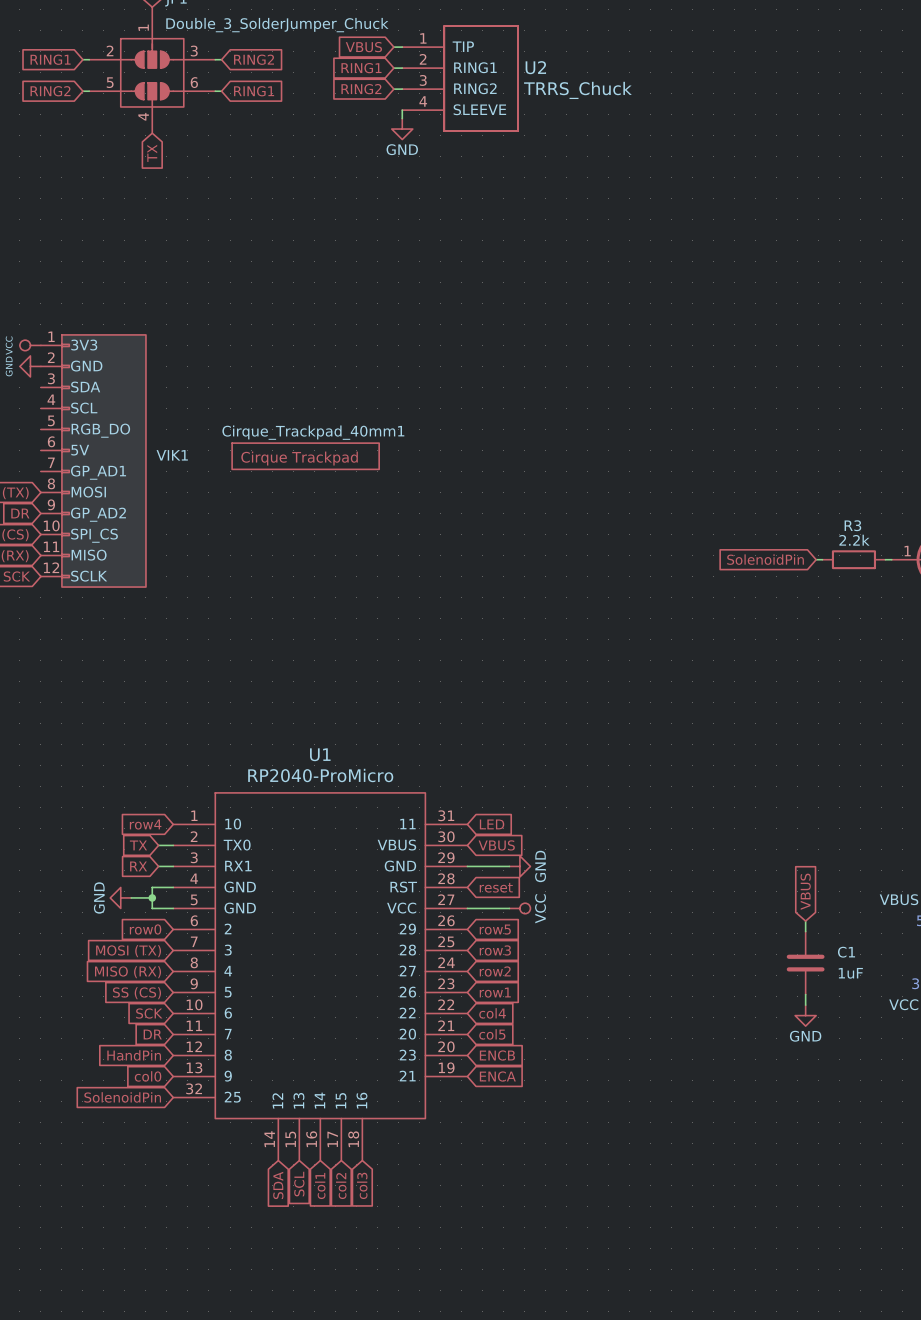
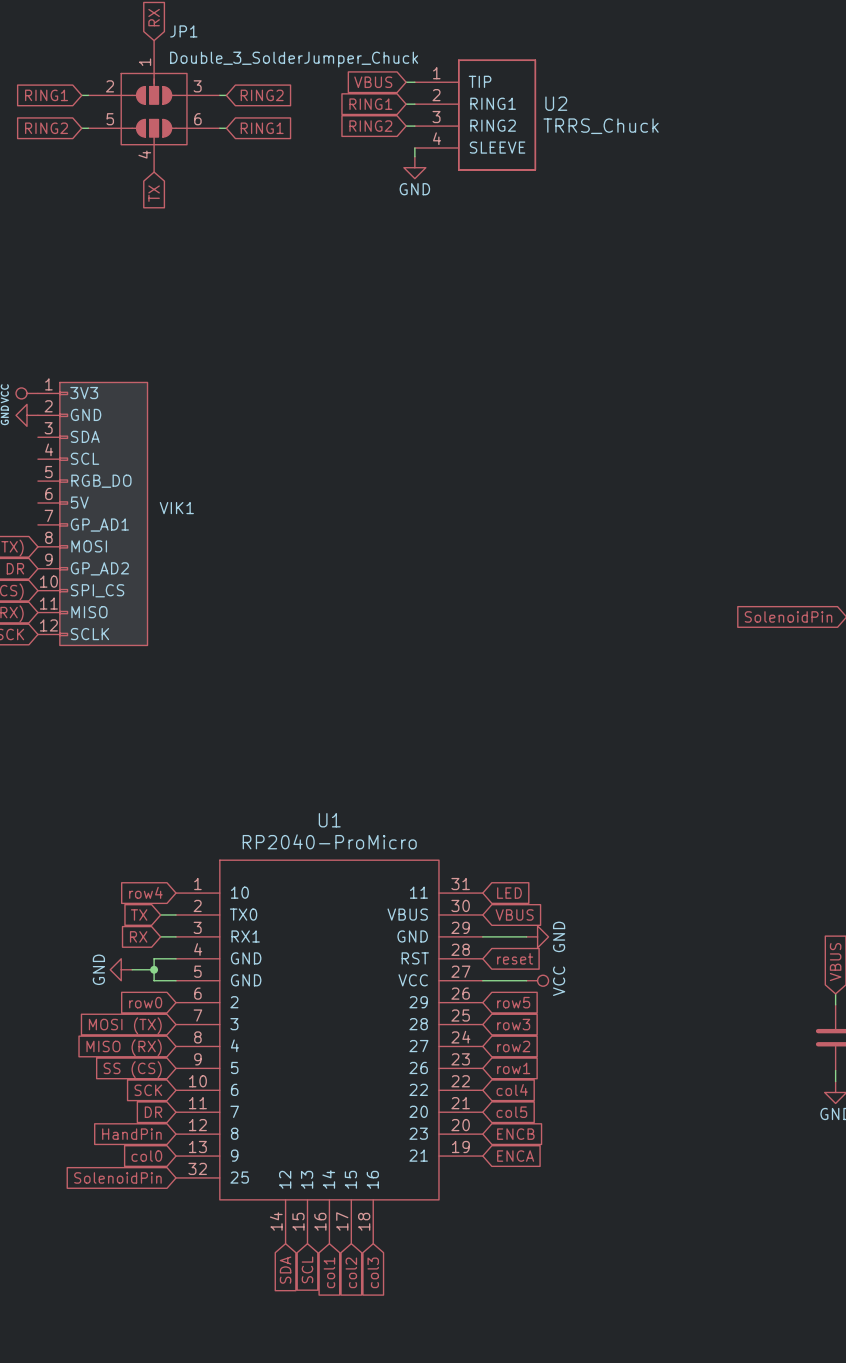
Cirque_Trackpad_40mm1: (305, 456) -> none

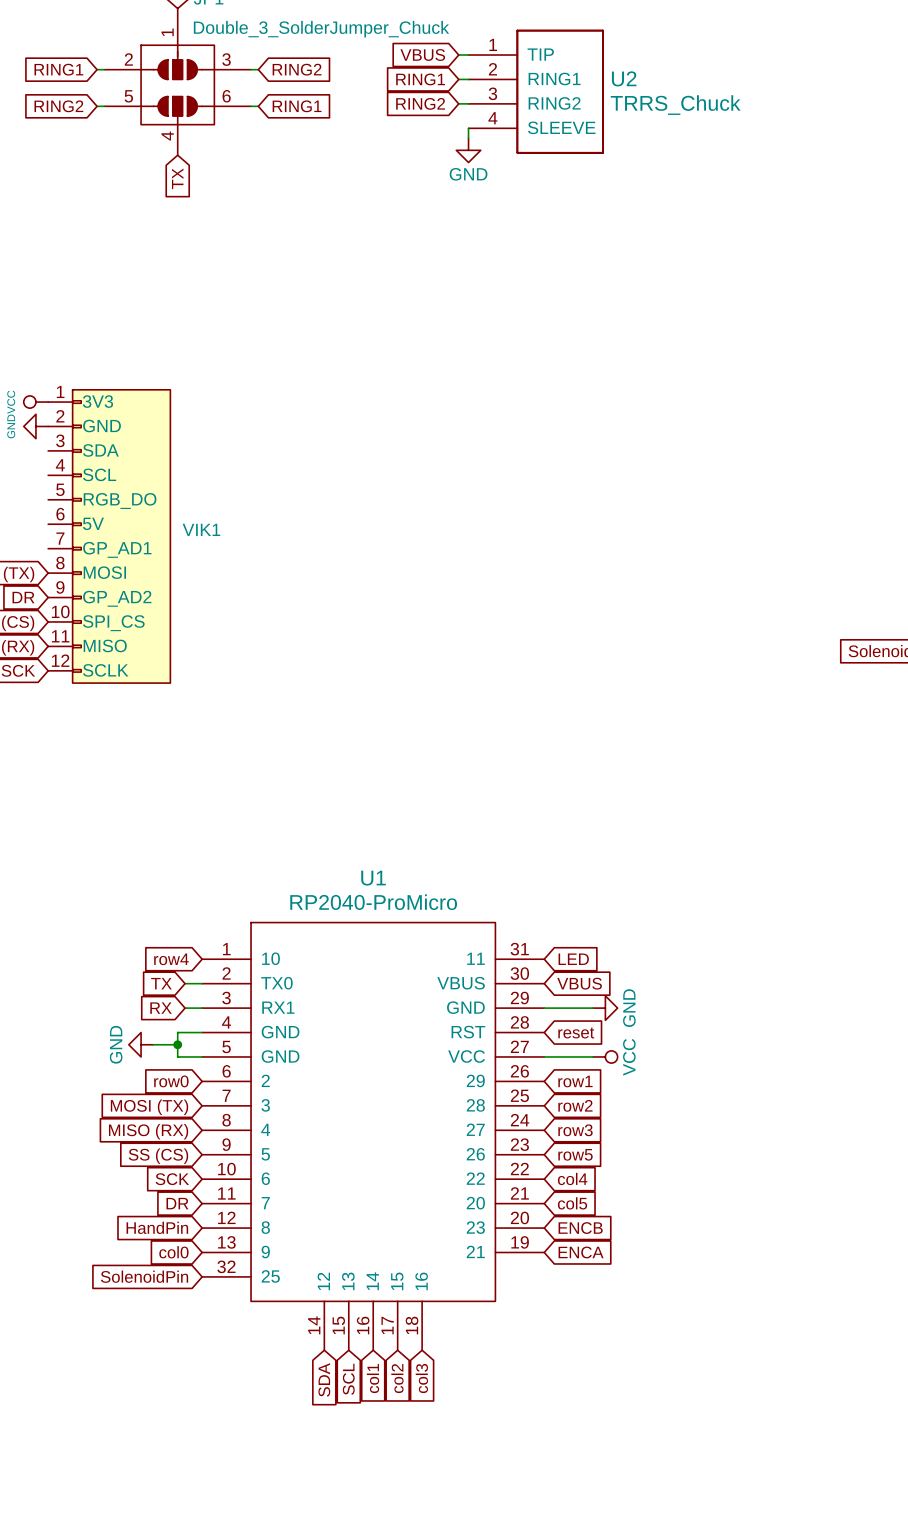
global label: row5 (513, 1002) -> row1 (575, 1081)
global label: row3 (513, 1024) -> row2 (575, 1105)
global label: row2 (513, 1046) -> row3 (575, 1130)
global label: row1 (513, 1068) -> row5 (575, 1154)

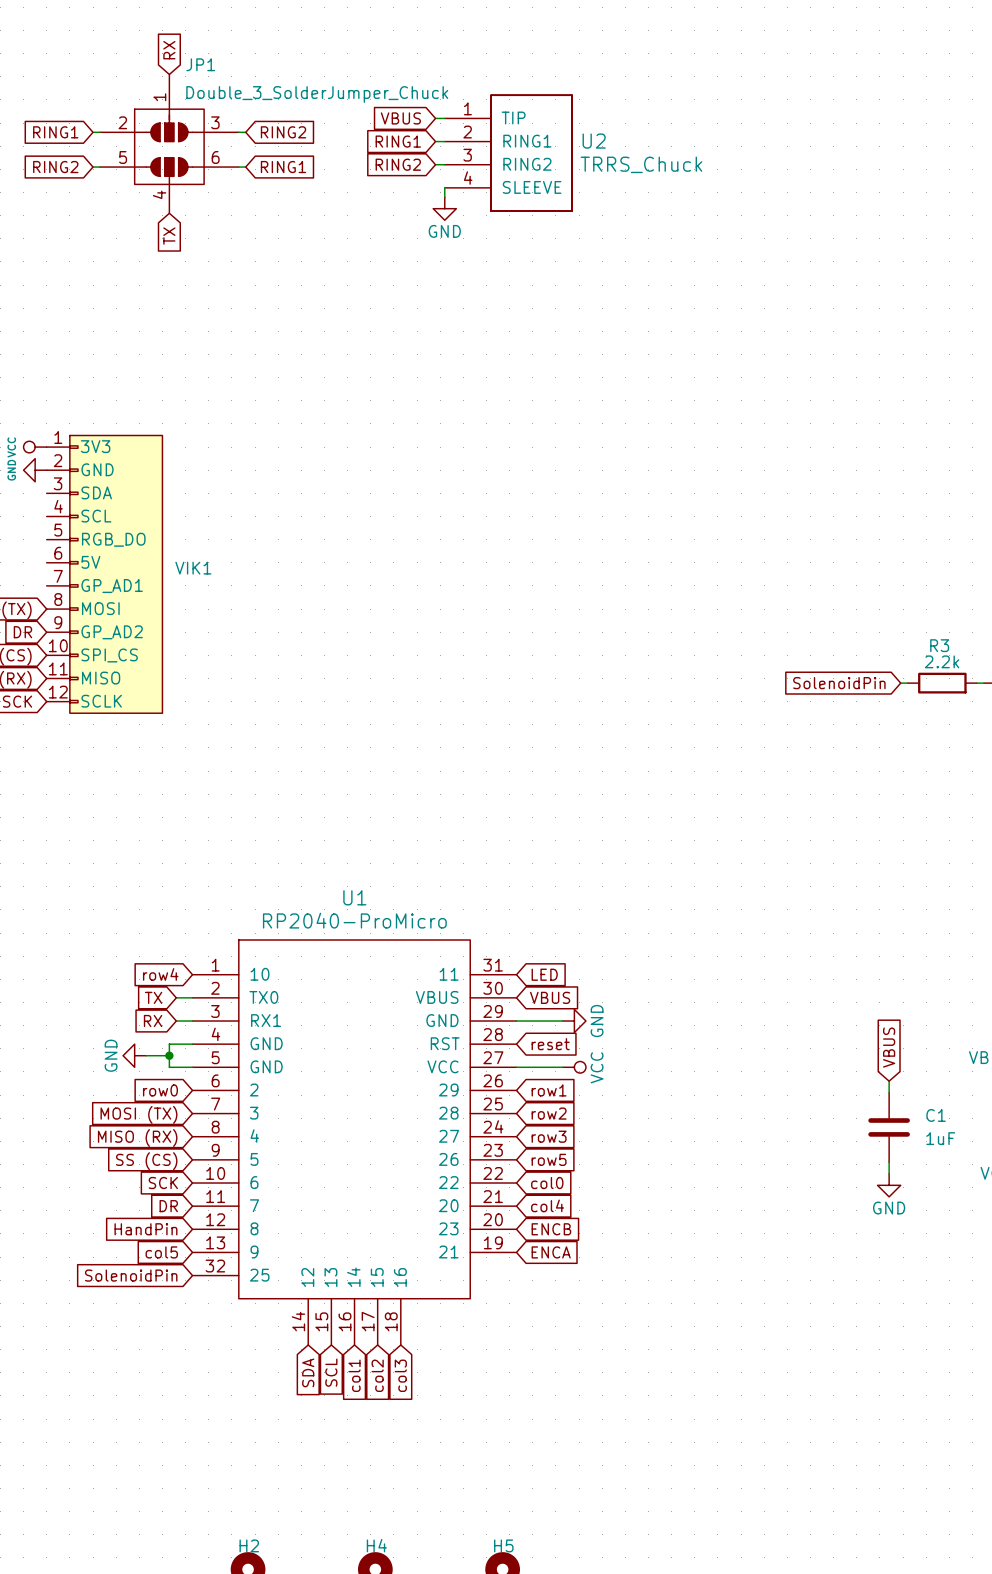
global label: col4 (572, 1178) -> col0 (547, 1183)
global label: col5 (572, 1203) -> col4 (547, 1205)
global label: col0 (173, 1252) -> col5 (161, 1252)

